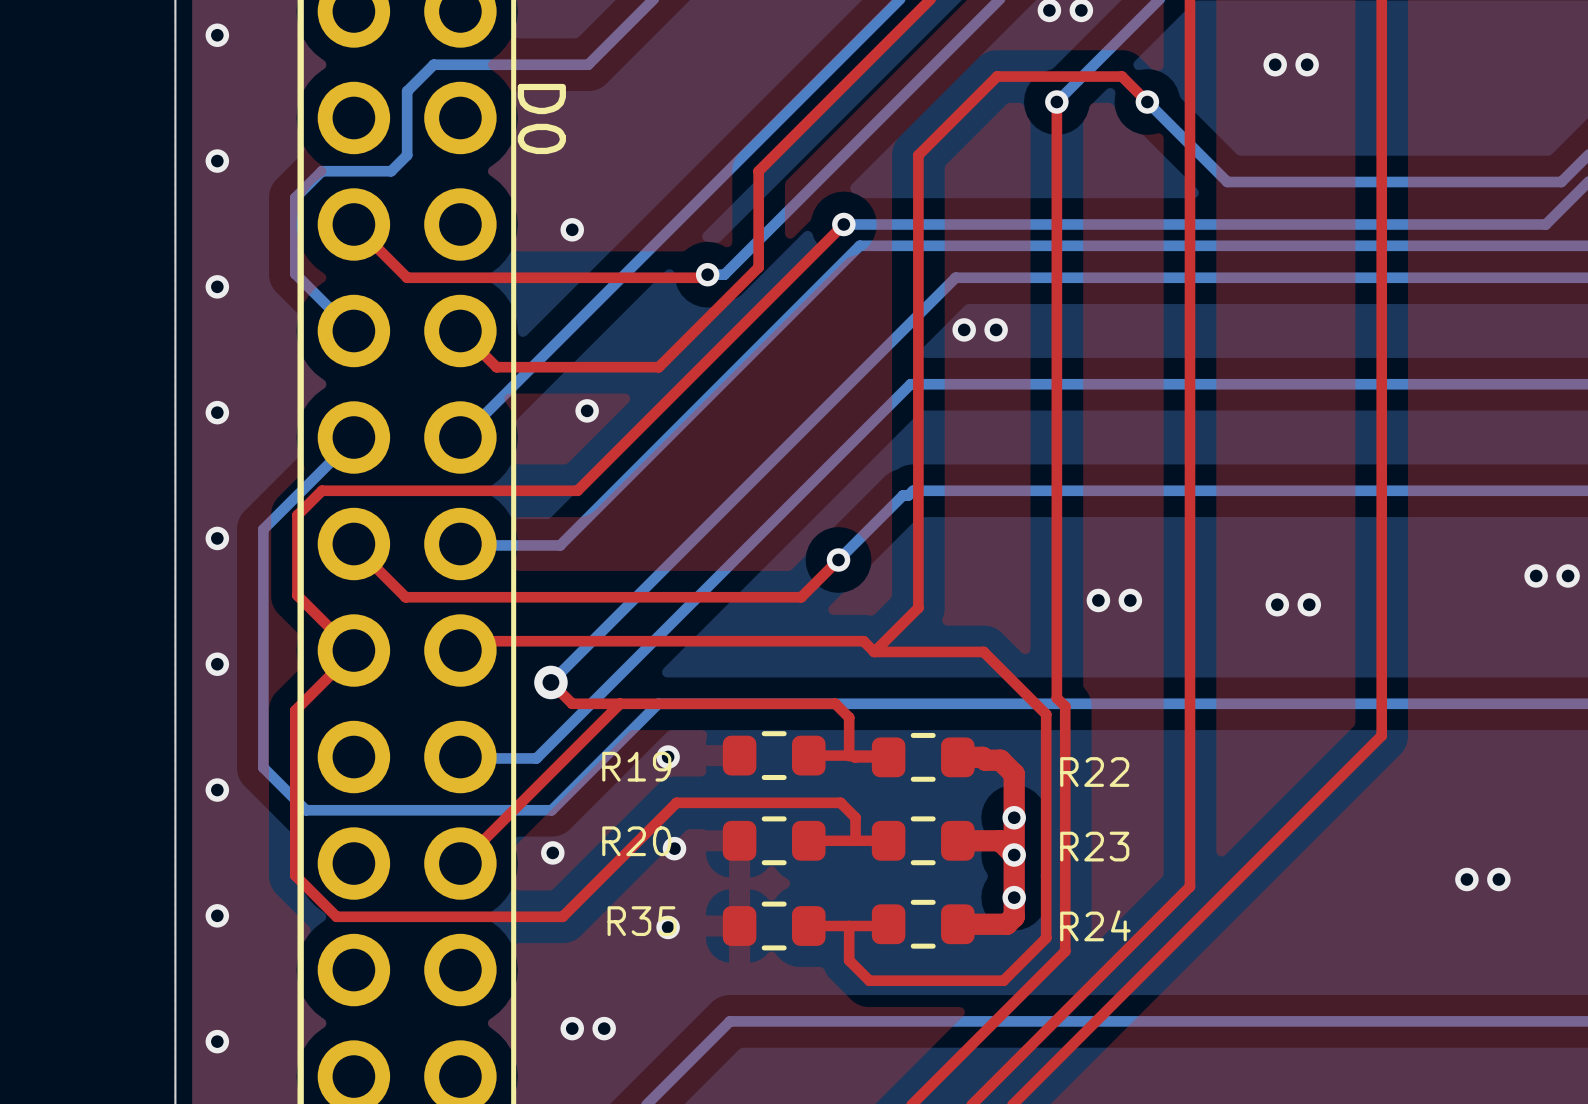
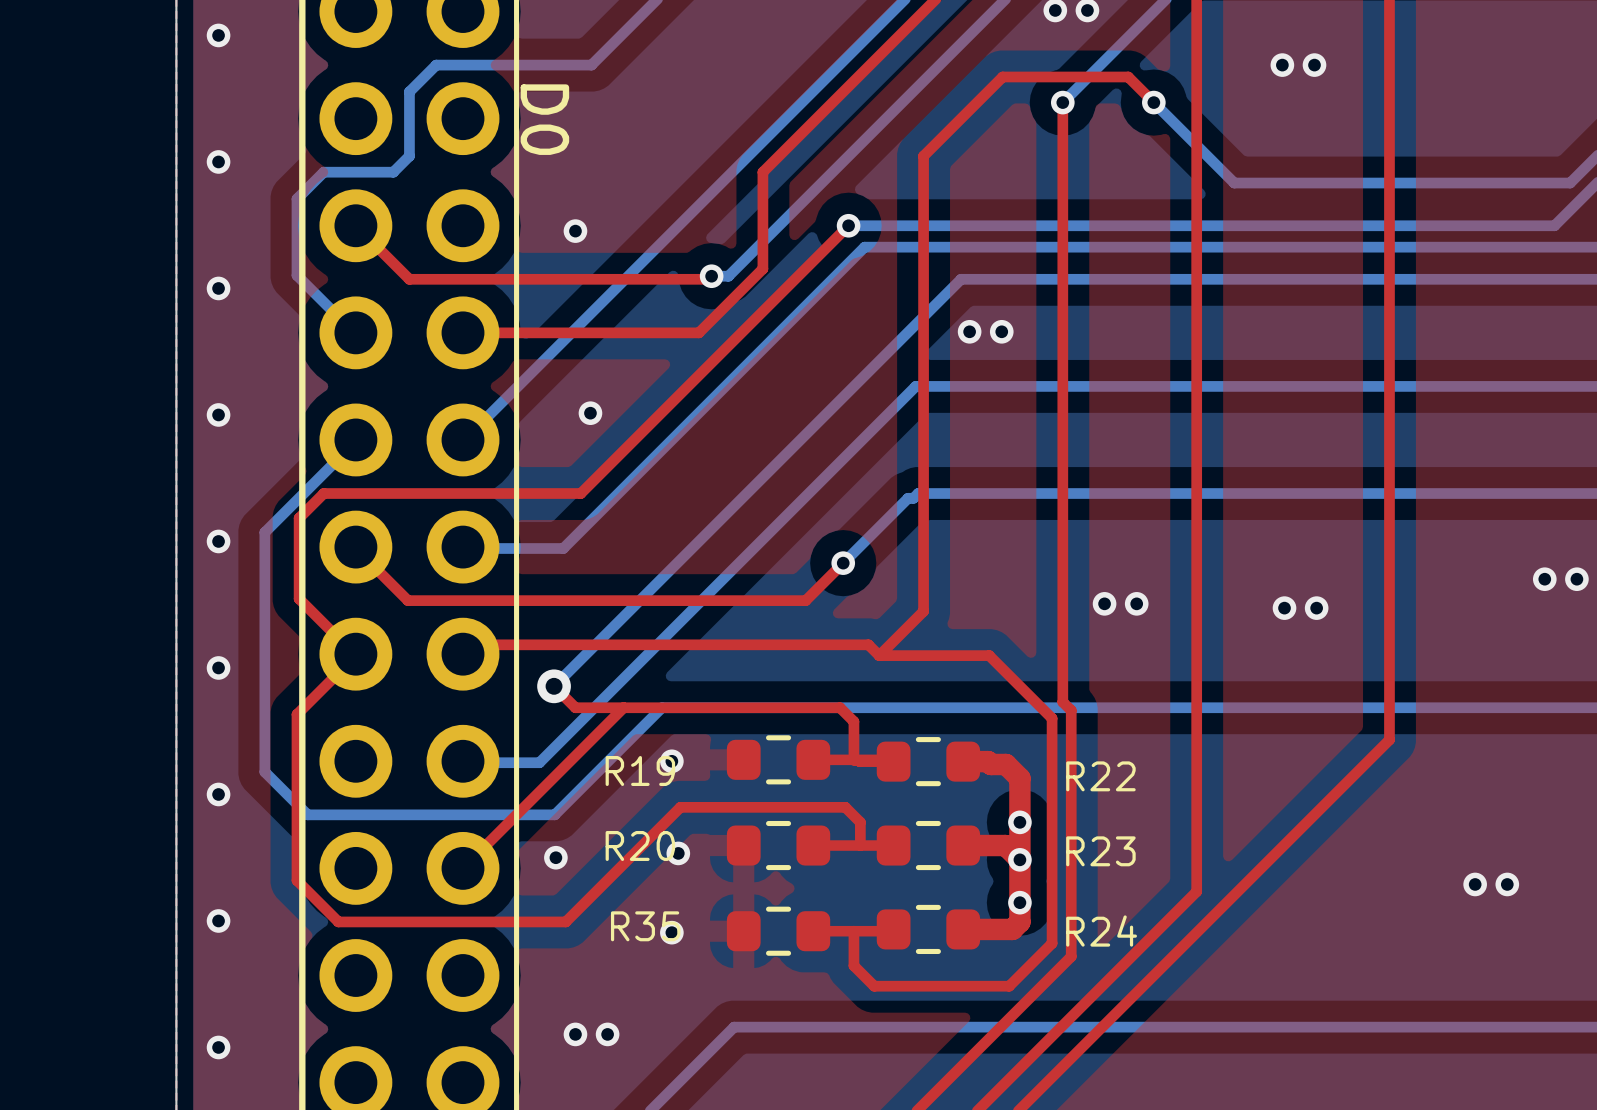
top track: (460, 330) (496, 367) (658, 367) (695, 330) -> (463, 332) (698, 332)

